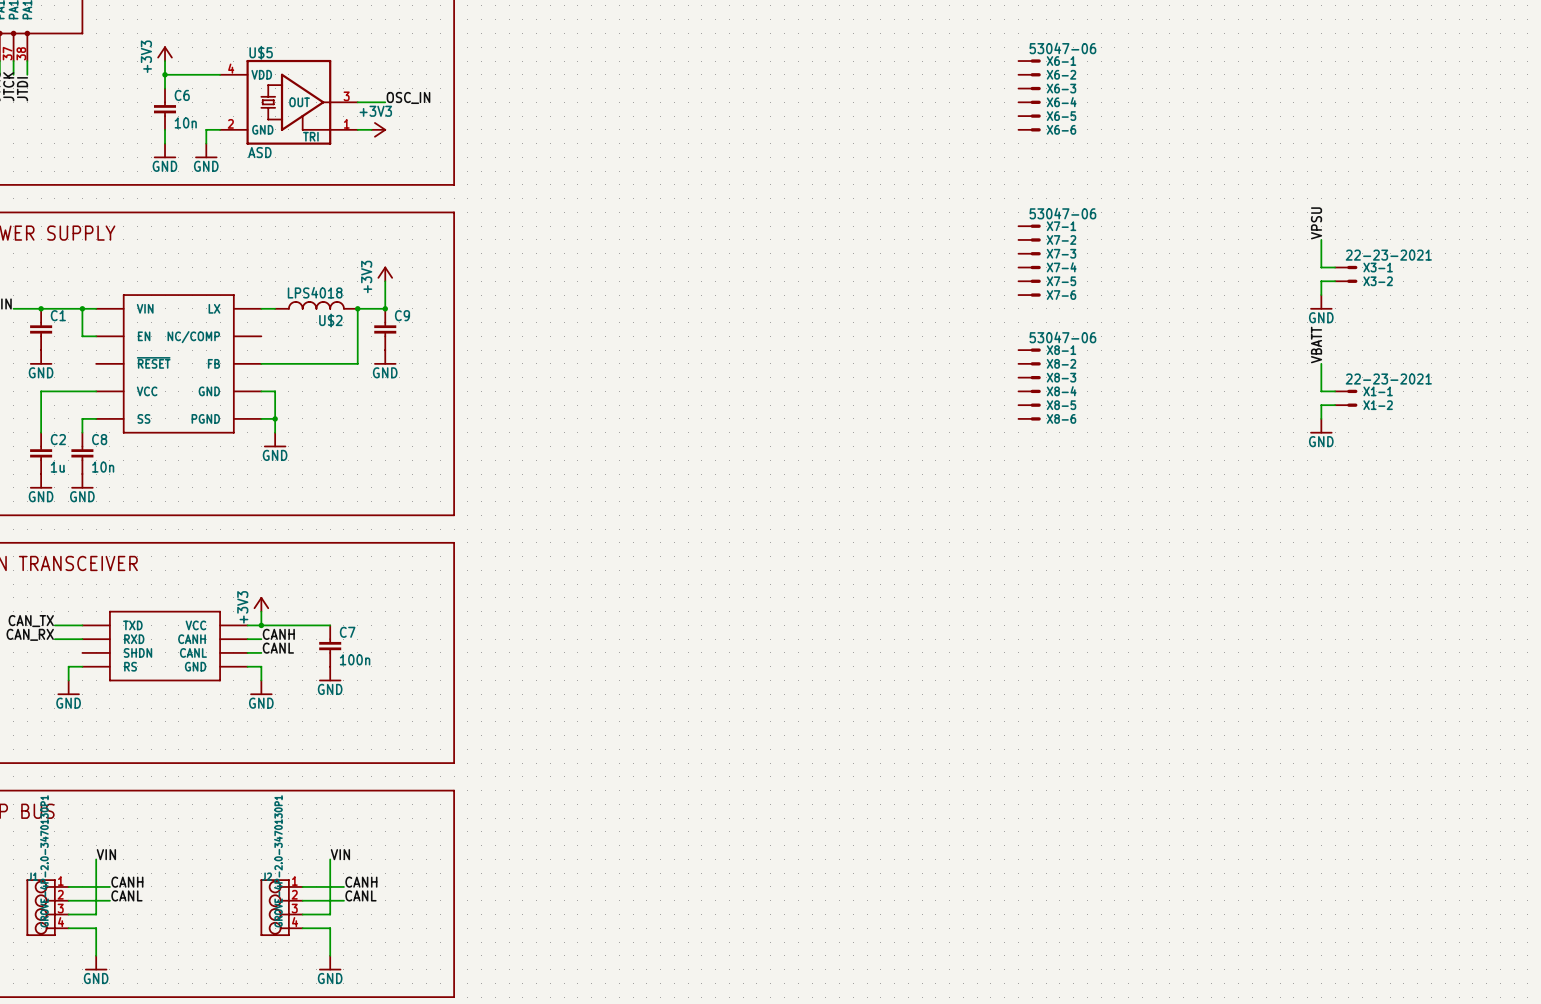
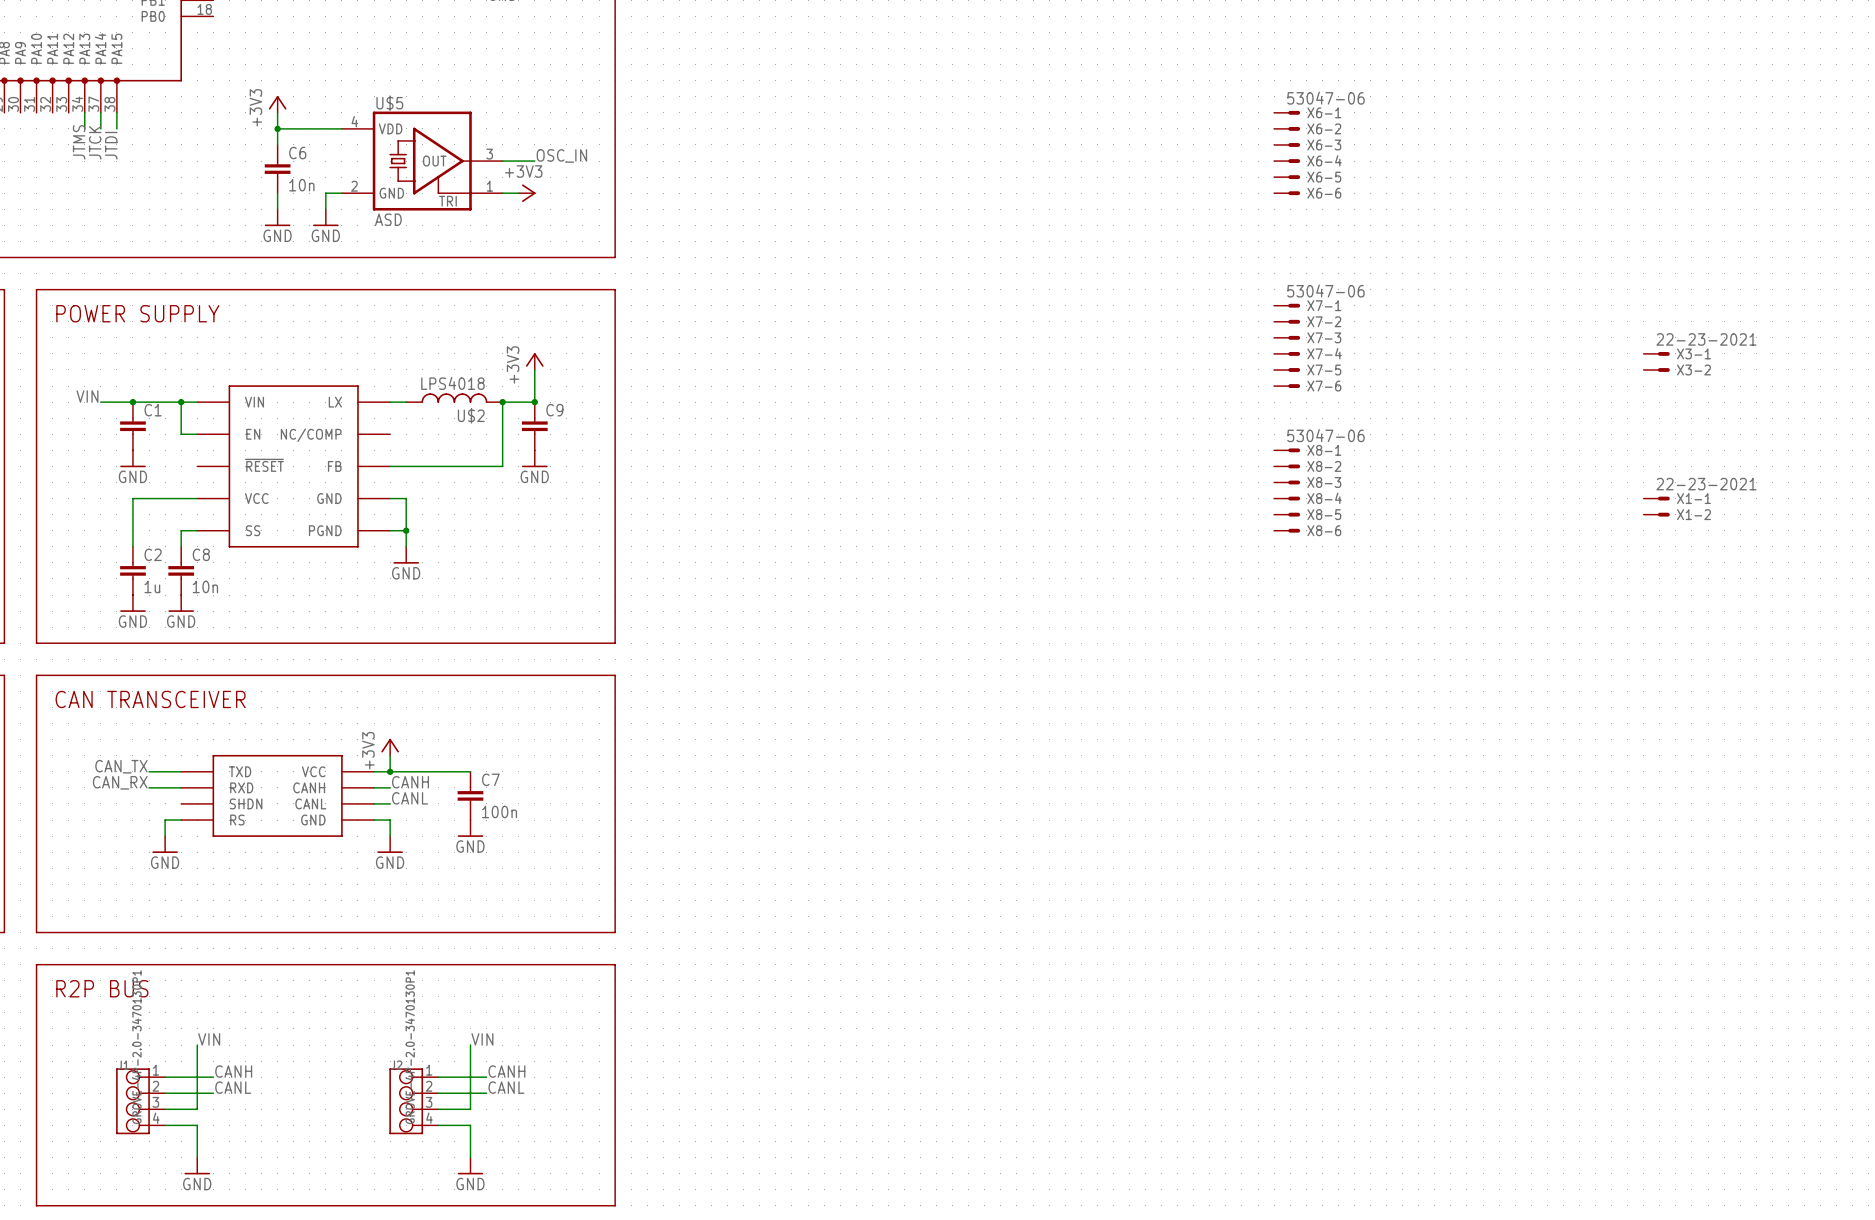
label: VPSU (1316, 223) -> none
wire: (1321, 239) (1321, 267) (1335, 267) -> none
wire: (1335, 281) (1321, 281) (1321, 295) -> none
power symbol: GND (1321, 302) -> none
label: VBATT (1316, 344) -> none
wire: (1321, 363) (1321, 391) (1335, 391) -> none
wire: (1335, 405) (1321, 405) (1321, 418) -> none
power symbol: GND (1321, 426) -> none

